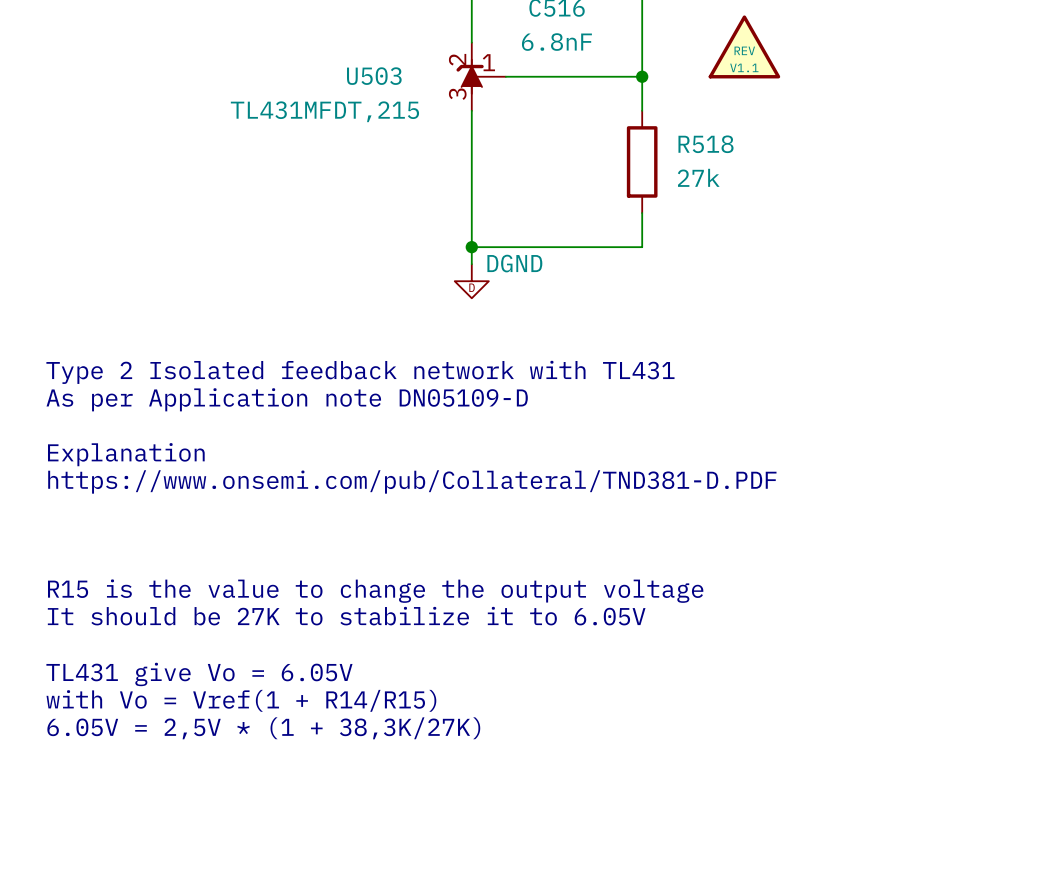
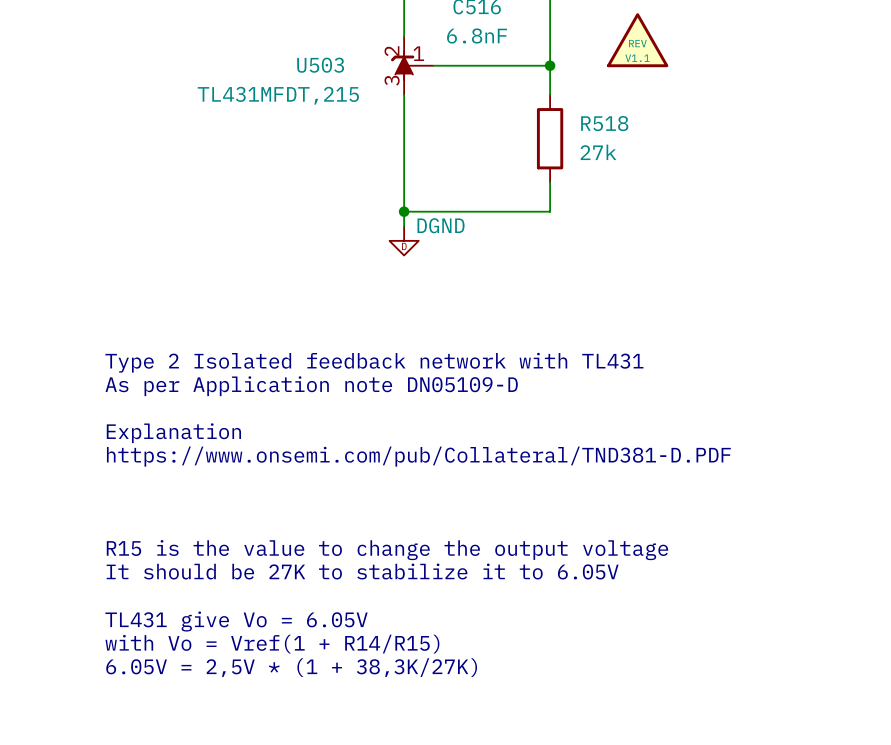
text position: Type 2 Isolated feedback network with TL431 (360, 372) -> Type 2 Isolated feedback network with TL431 (374, 362)
text position: As per Application note DN05109-D (287, 399) -> As per Application note DN05109-D (311, 386)
text position: Explanation (126, 454) -> Explanation (173, 433)
text position: https://www.onsemi.com/pub/Collateral/TND381-D.PDF (412, 481) -> https://www.onsemi.com/pub/Collateral/TND381-D.PDF (418, 456)
text position: R15 is the value to change the output voltage (375, 591) -> R15 is the value to change the output voltage (387, 550)
text position: It should be 27K to stabilize it to 6.05V (346, 616) -> It should be 27K to stabilize it to 6.05V (362, 571)
text position: TL431 give Vo = 6.05V (199, 674) -> TL431 give Vo = 6.05V (236, 621)
text position: with Vo = Vref(1 + R14/R15) (241, 700) -> with Vo = Vref(1 + R14/R15) (272, 644)
text position: 6.05V = 2,5V * (1 + 38,3K/27K) (263, 728) -> 6.05V = 2,5V * (1 + 38,3K/27K) (291, 667)

